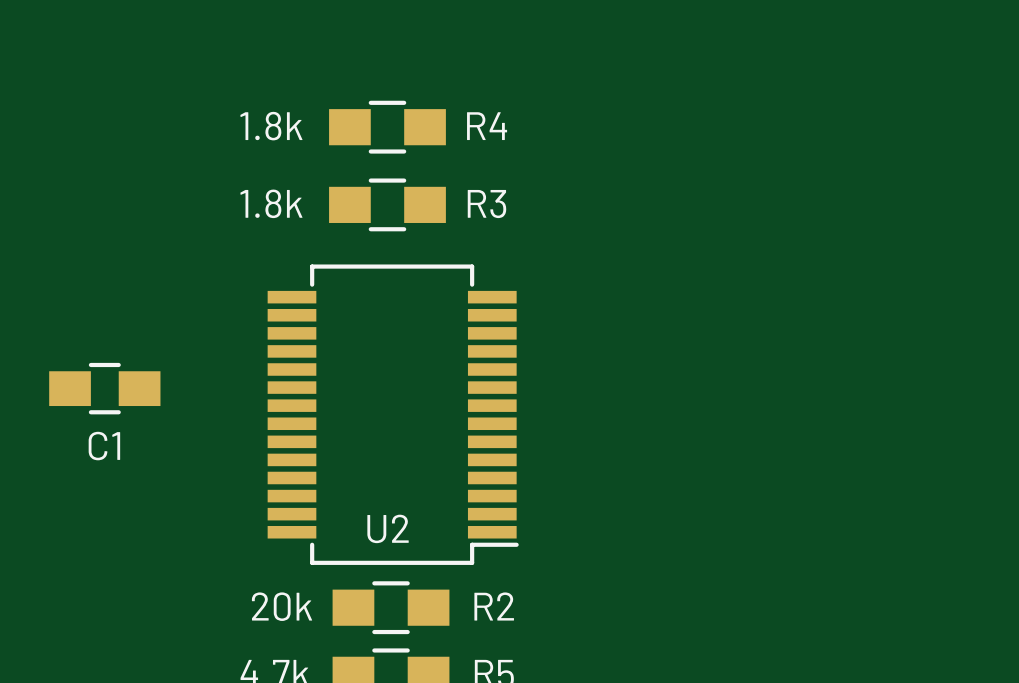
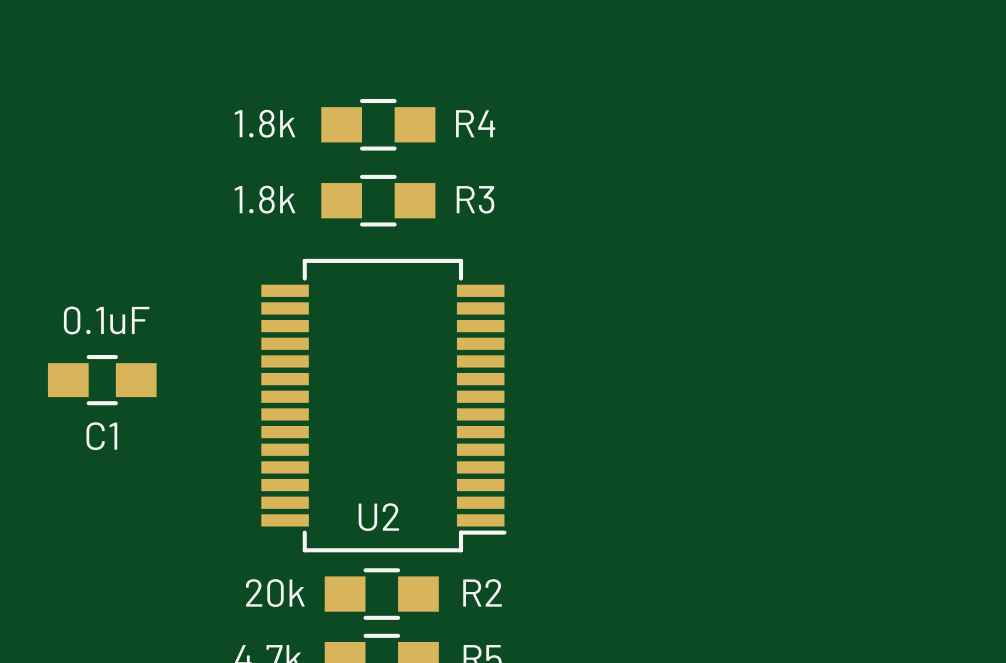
C1 value: none -> 0.1uF (106, 320)

